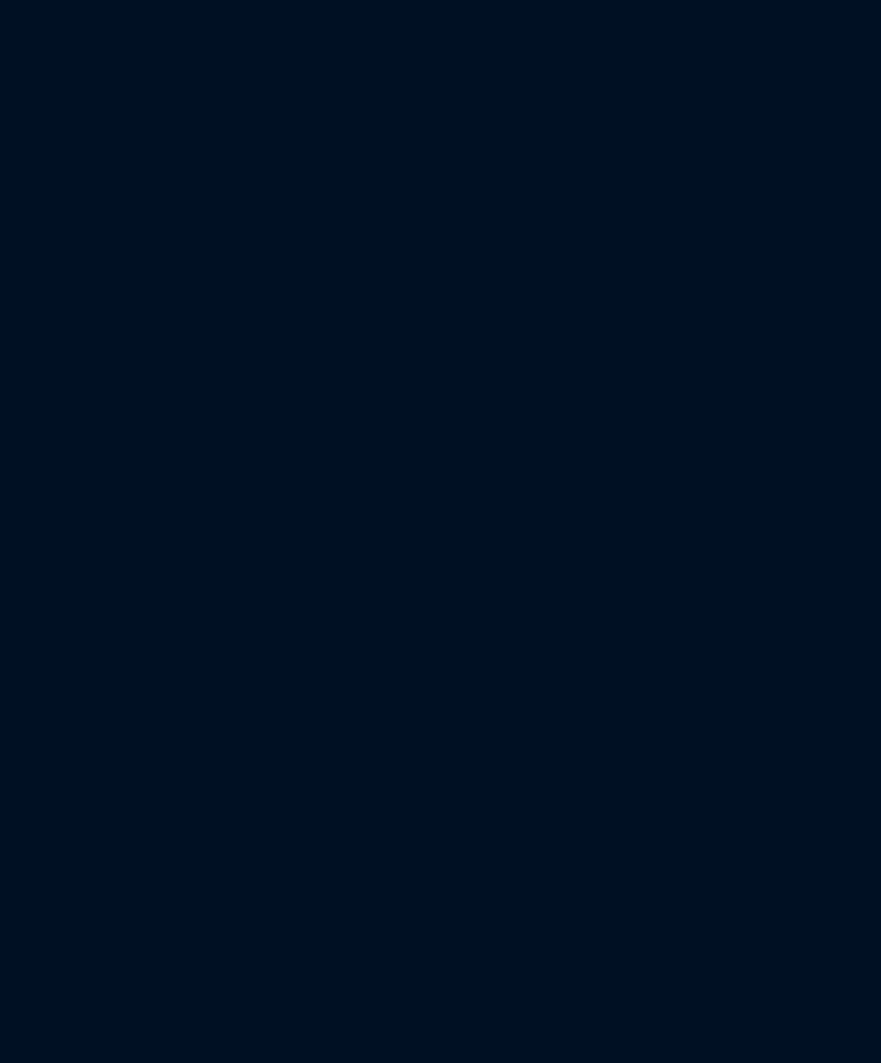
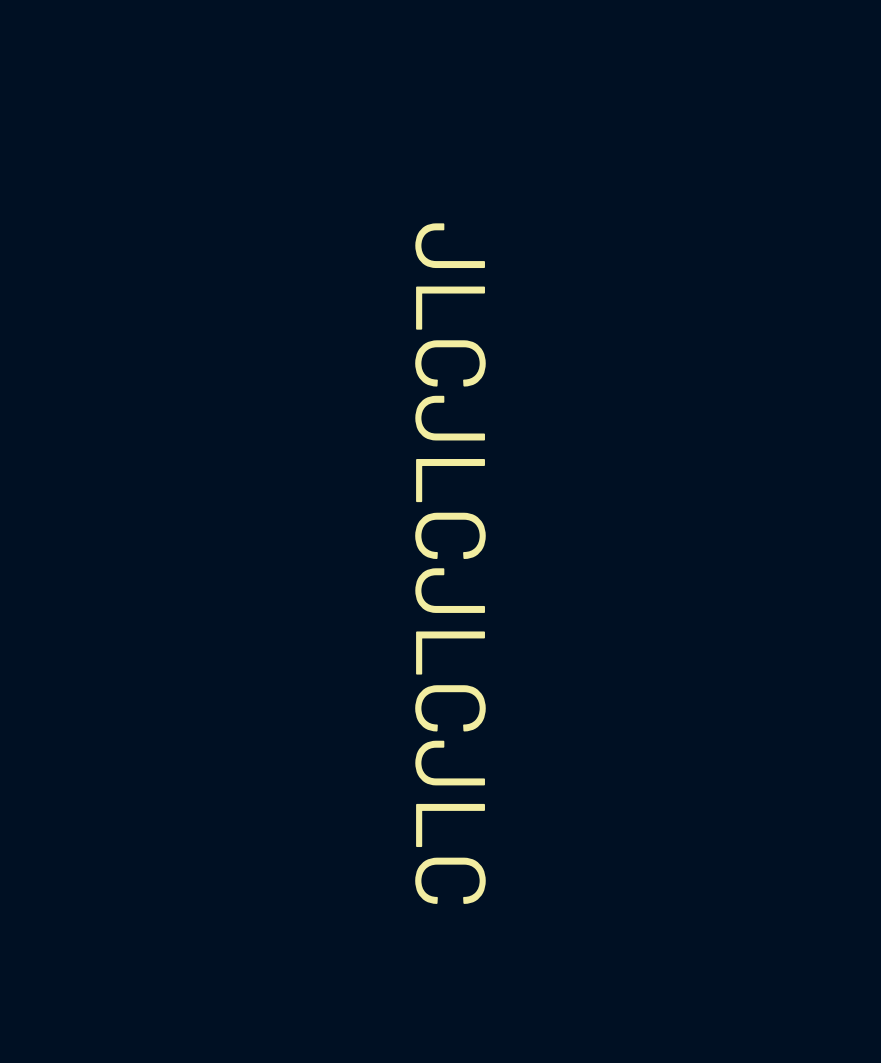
text: none -> JLCJLCJLCJLC (450, 563)

